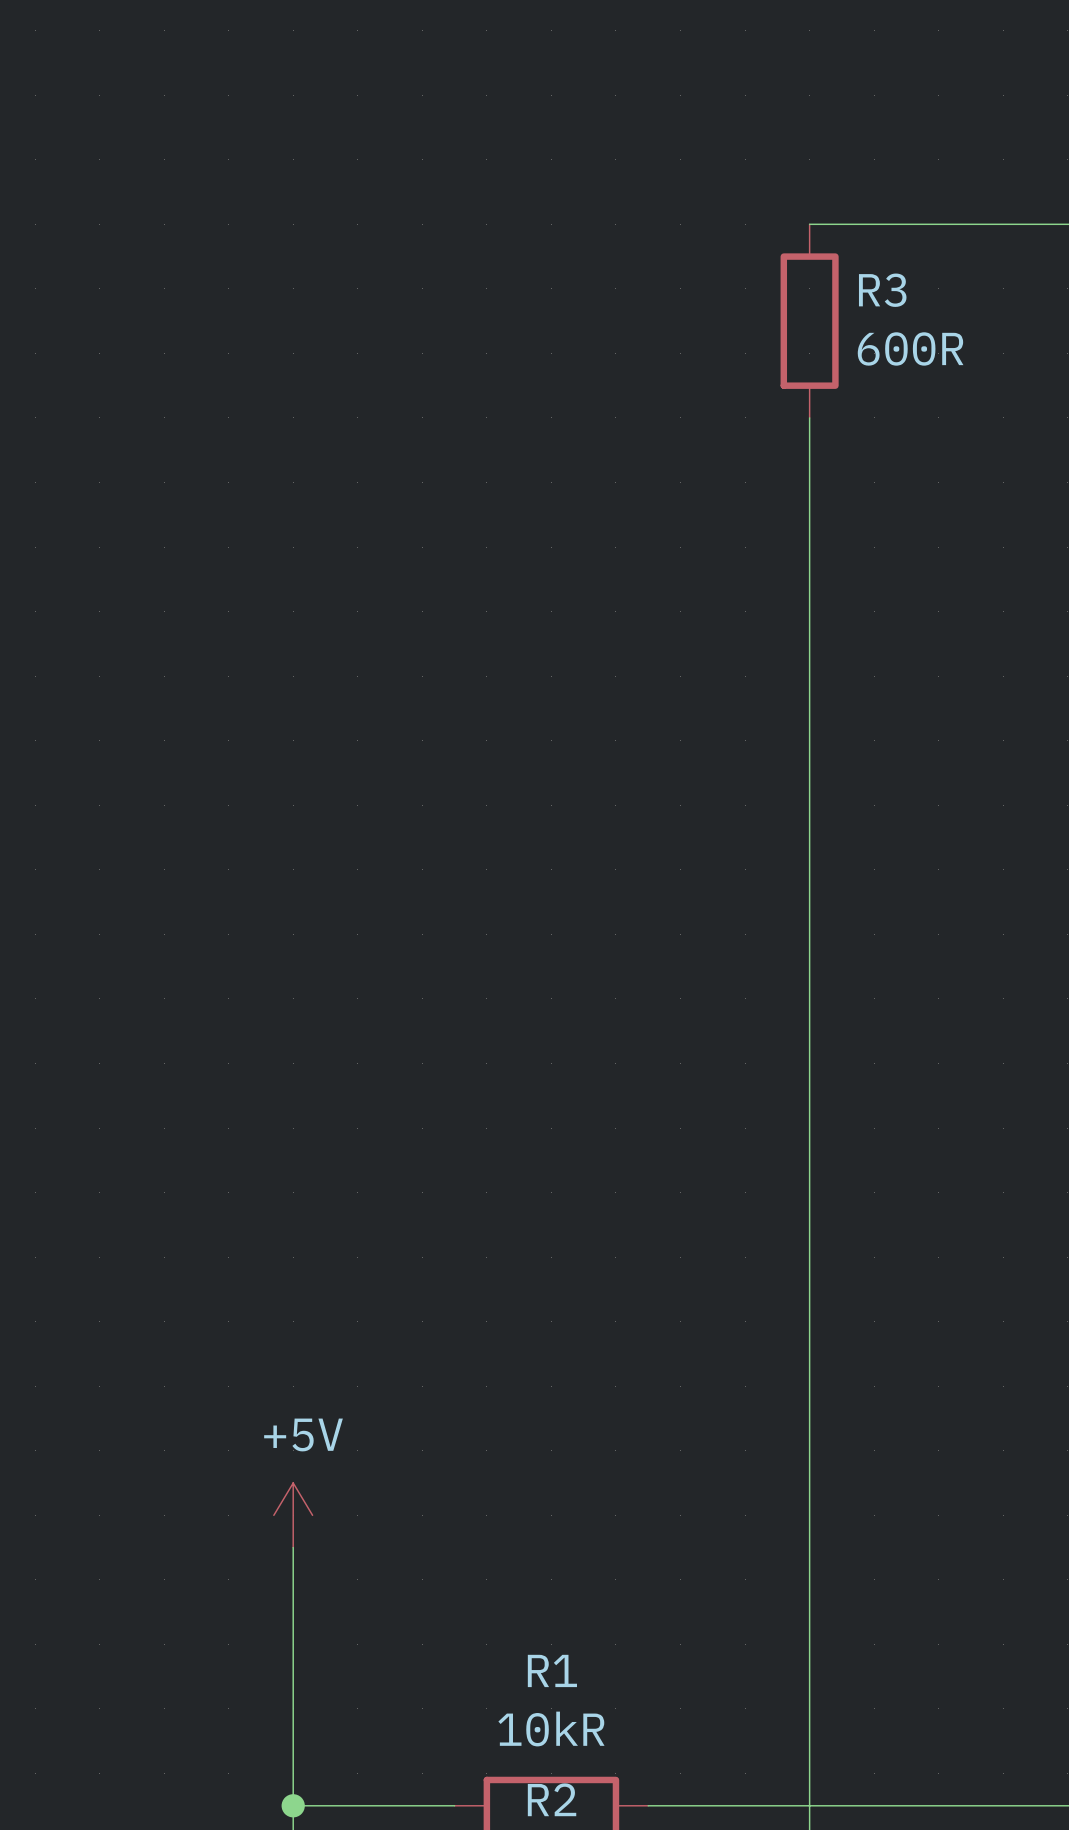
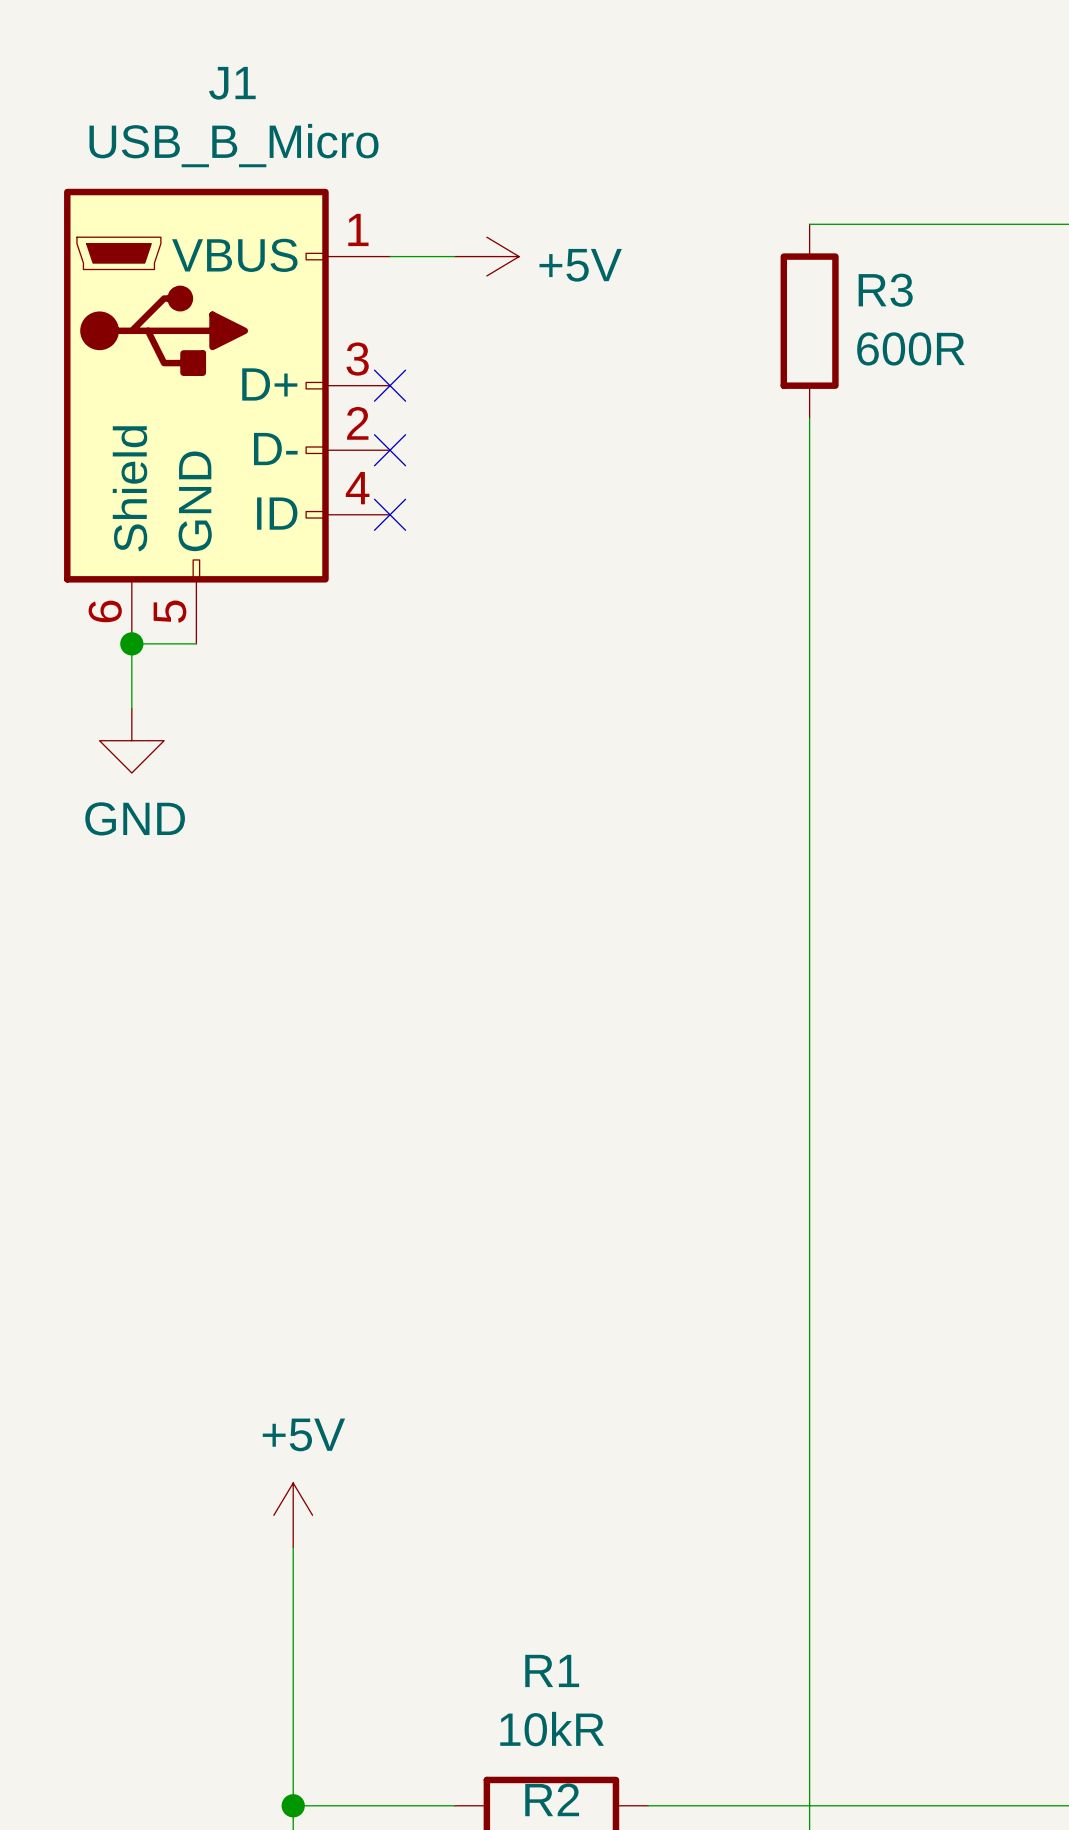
wire: none -> (390, 256) (454, 256)
power symbol: none -> +5V (486, 256)
no-connect mark: none -> (390, 385)
J1: none -> USB_B_Micro (227, 416)
no-connect mark: none -> (390, 450)
no-connect mark: none -> (390, 514)
junction: none -> (131, 643)
wire: none -> (196, 643) (131, 643) (131, 708)
power symbol: none -> GND (131, 740)

